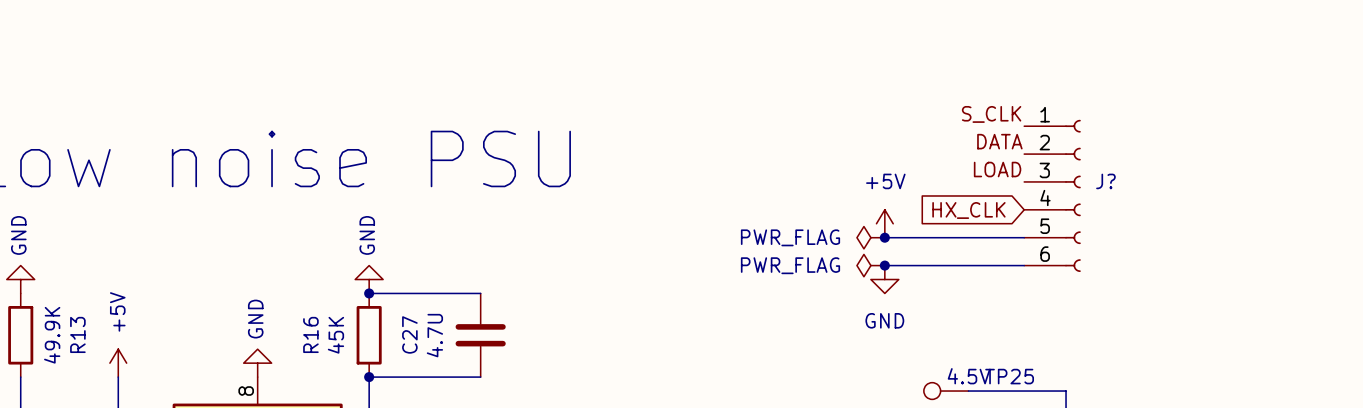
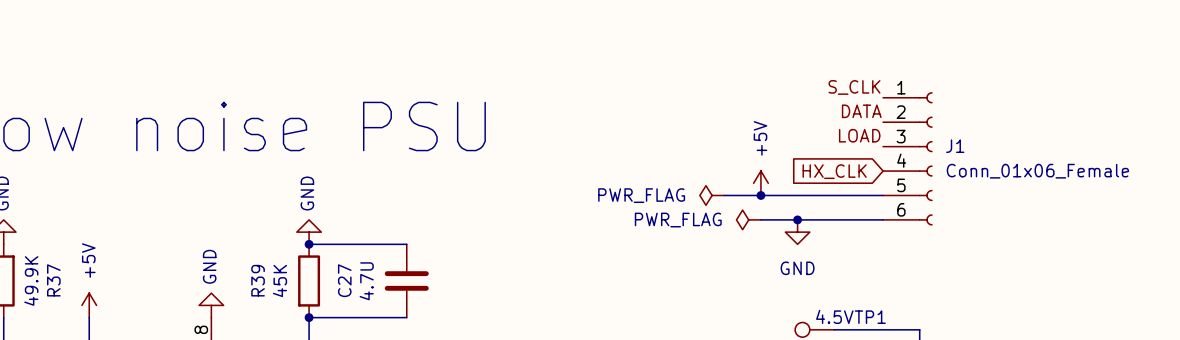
power symbol text rotation: 0° (885, 181) -> 90° counterclockwise (760, 138)
J? name: J? (1105, 181) -> J1 (955, 146)
J? value: none -> Conn_01x06_Female (1037, 171)
wire: none -> (724, 195) (760, 195)
power symbol position: PWR_FLAG (870, 237) -> PWR_FLAG (712, 195)
junction position: (884, 265) -> (797, 219)
power symbol position: GND (884, 279) -> GND (797, 232)
R13 name: R13 (77, 334) -> R37 (53, 280)
R16 name: R16 (310, 334) -> R39 (258, 280)
TP25 name: TP25 (1009, 376) -> TP1 (870, 317)

